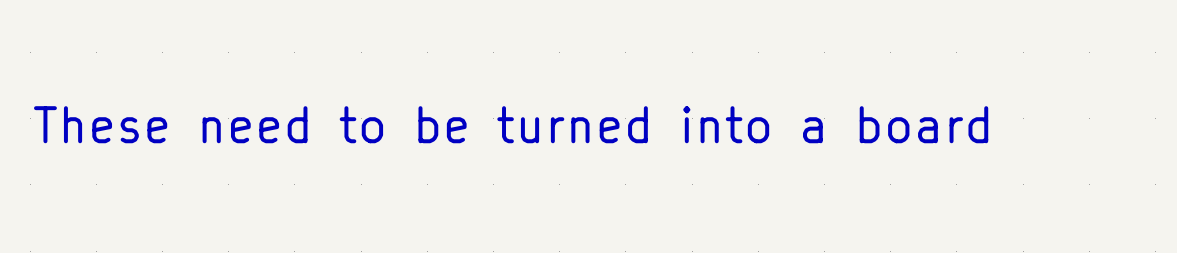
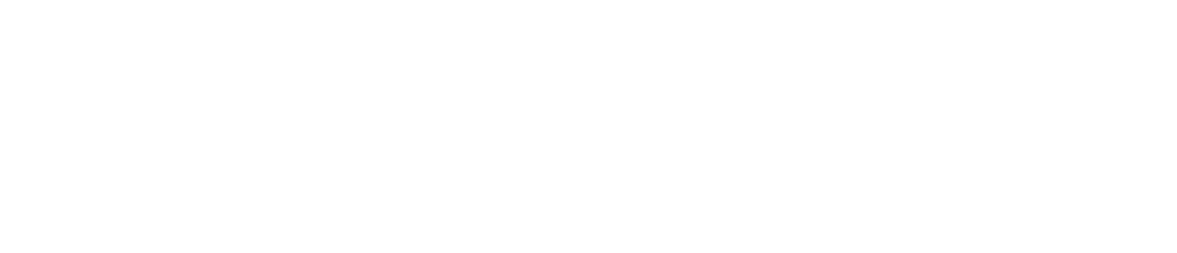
text: These need to be turned into a board (511, 124) -> none

